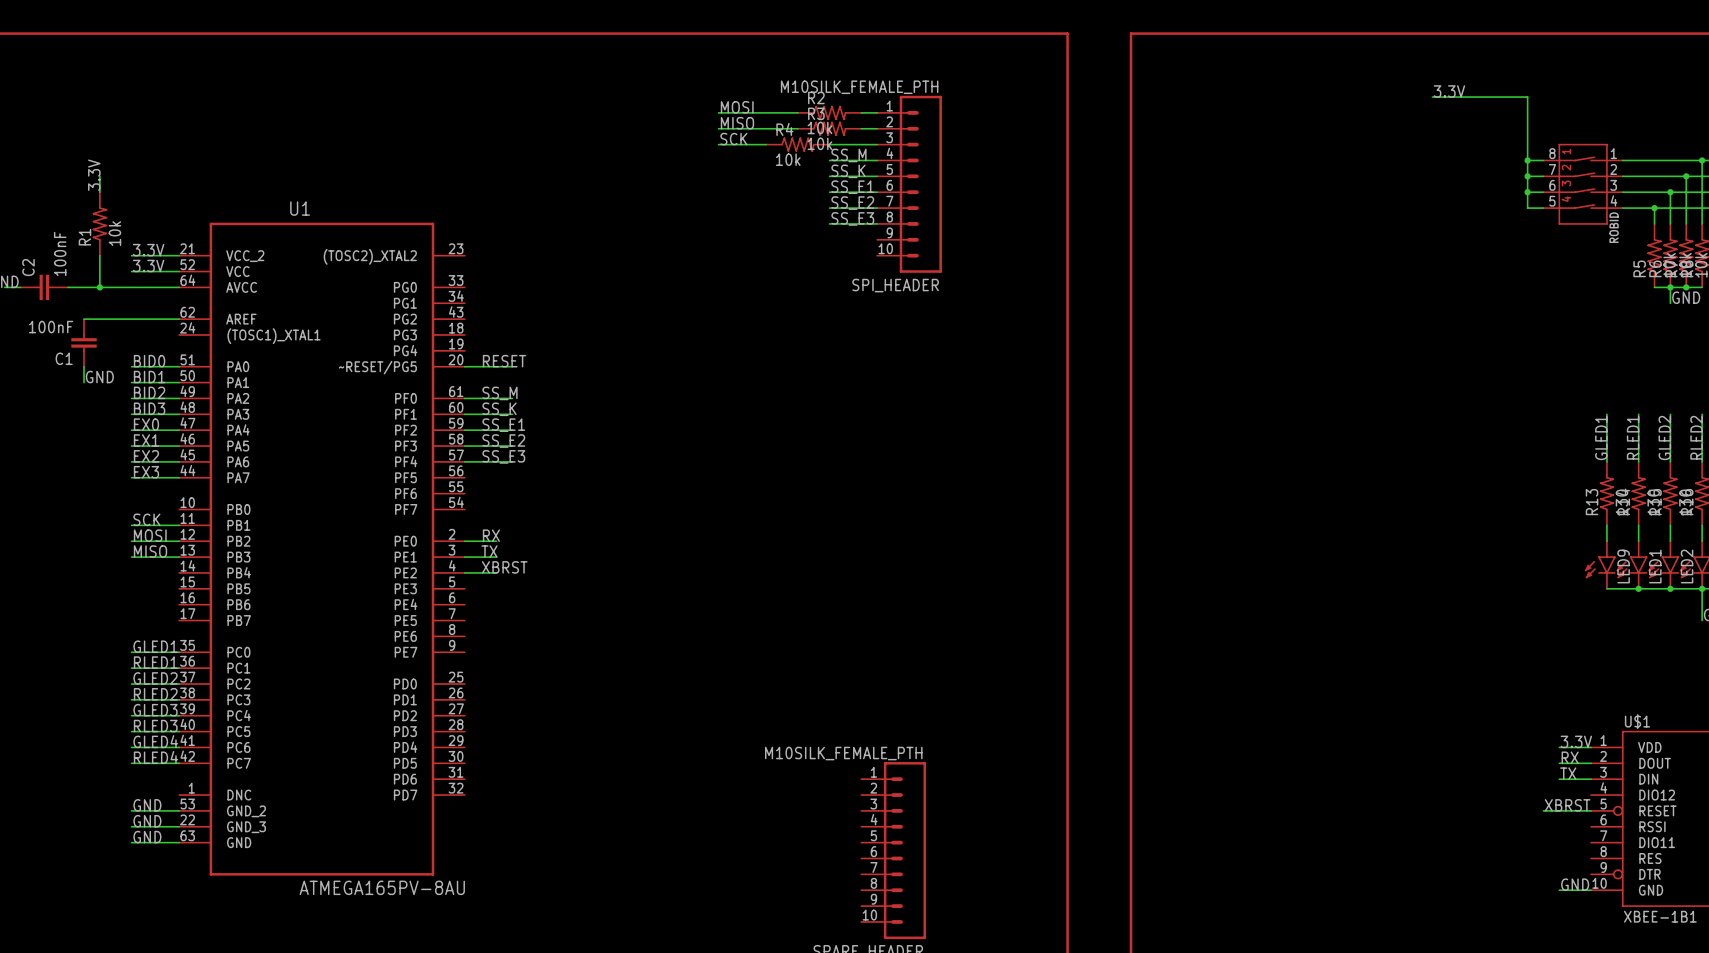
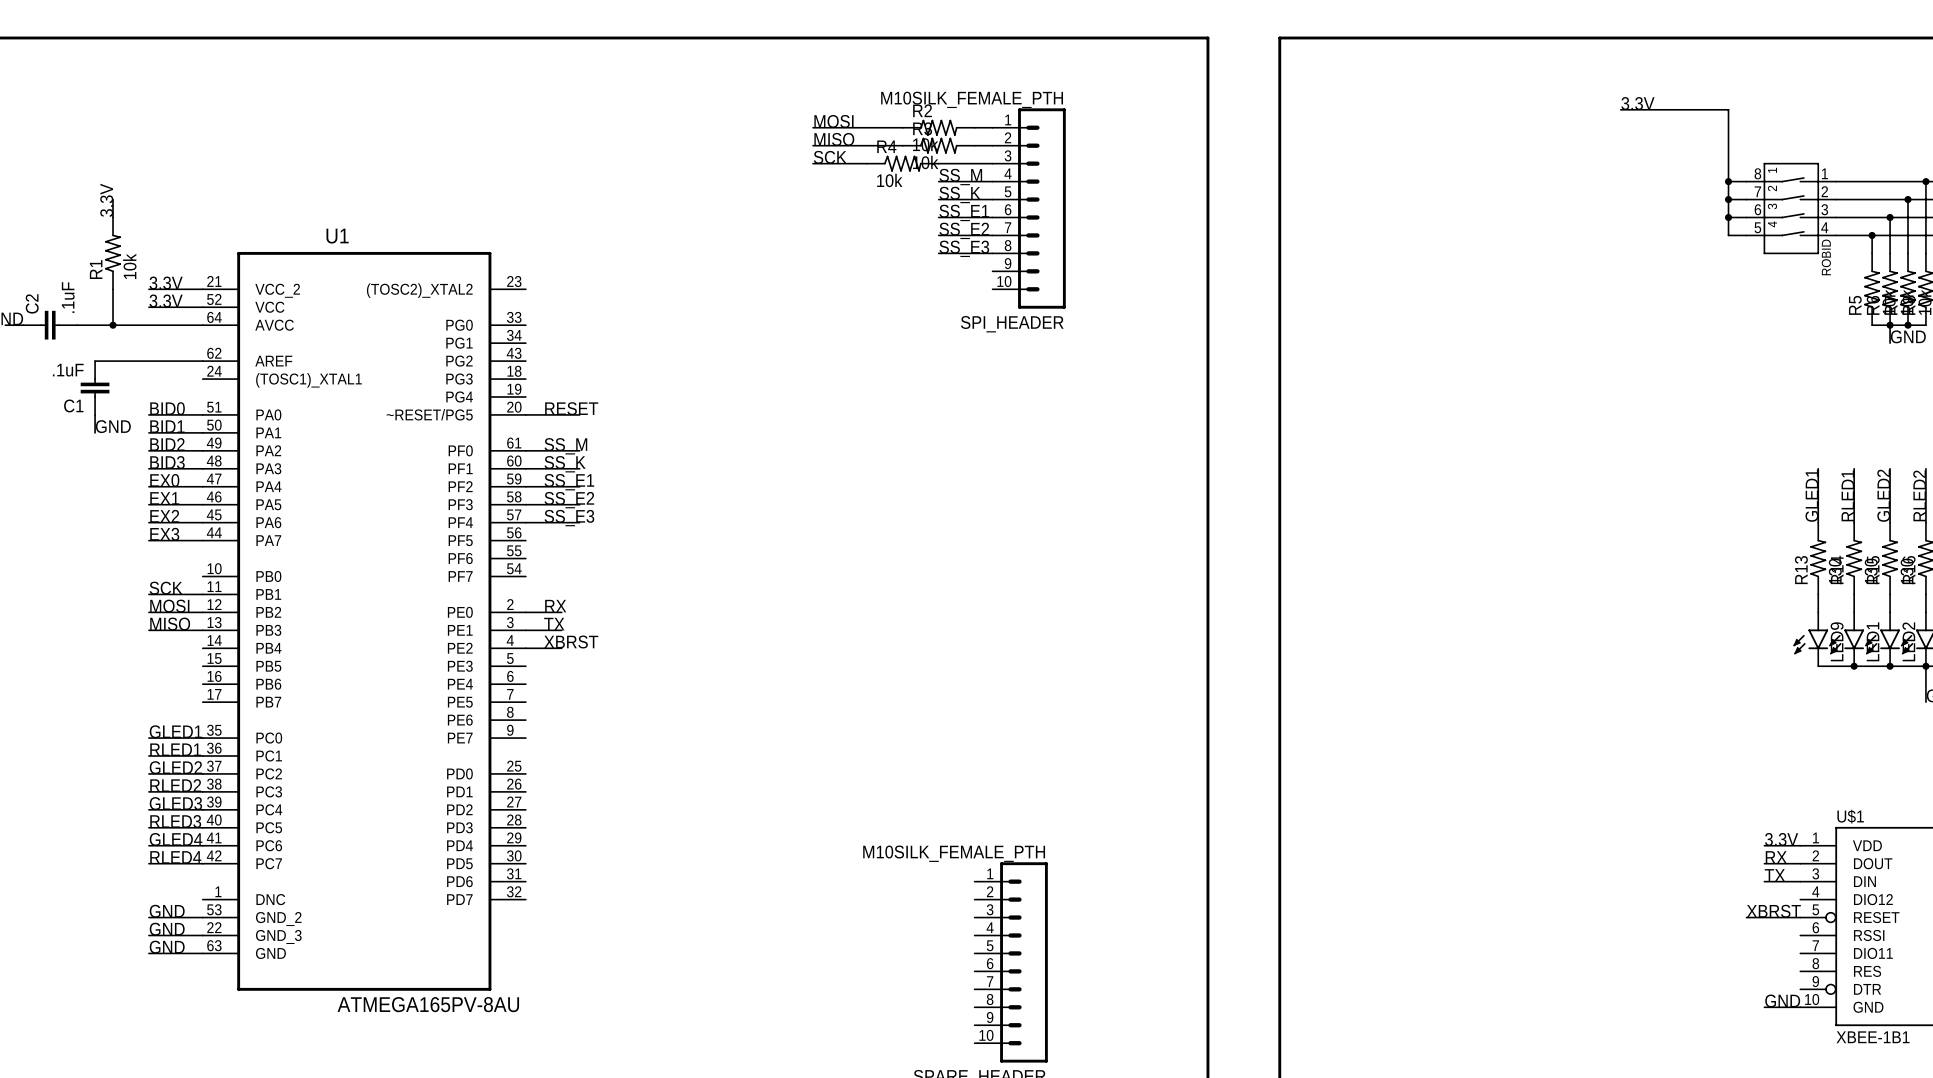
C2 value: 100nF (60, 253) -> .1uF (68, 297)
C1 value: 100nF (51, 327) -> .1uF (68, 370)

